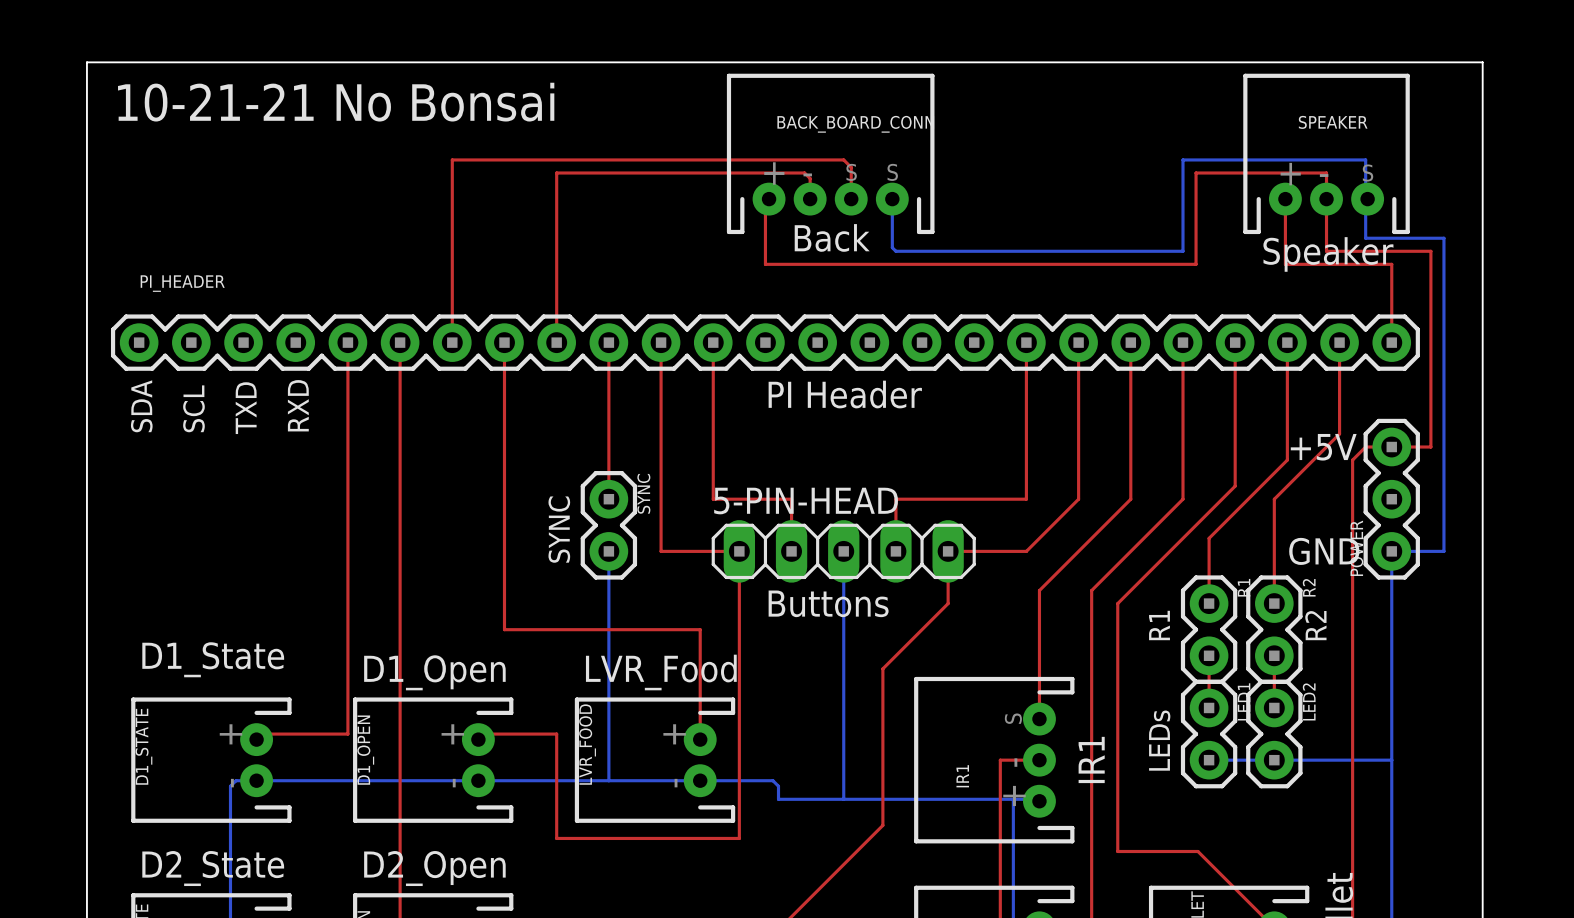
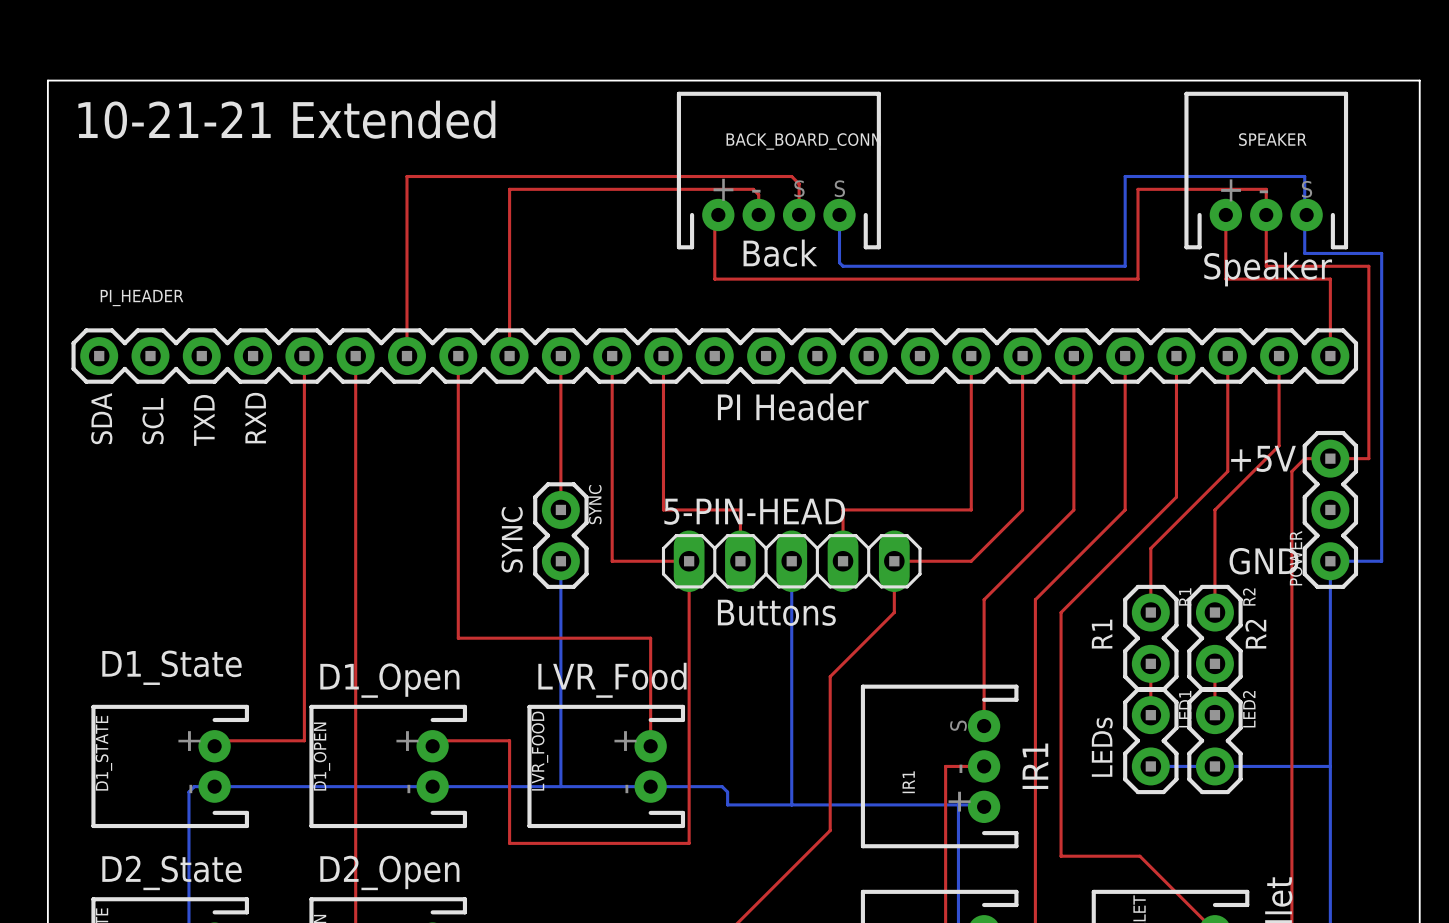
text: 10-21-21 No Bonsai (336, 102) -> 10-21-21 Extended (286, 119)

